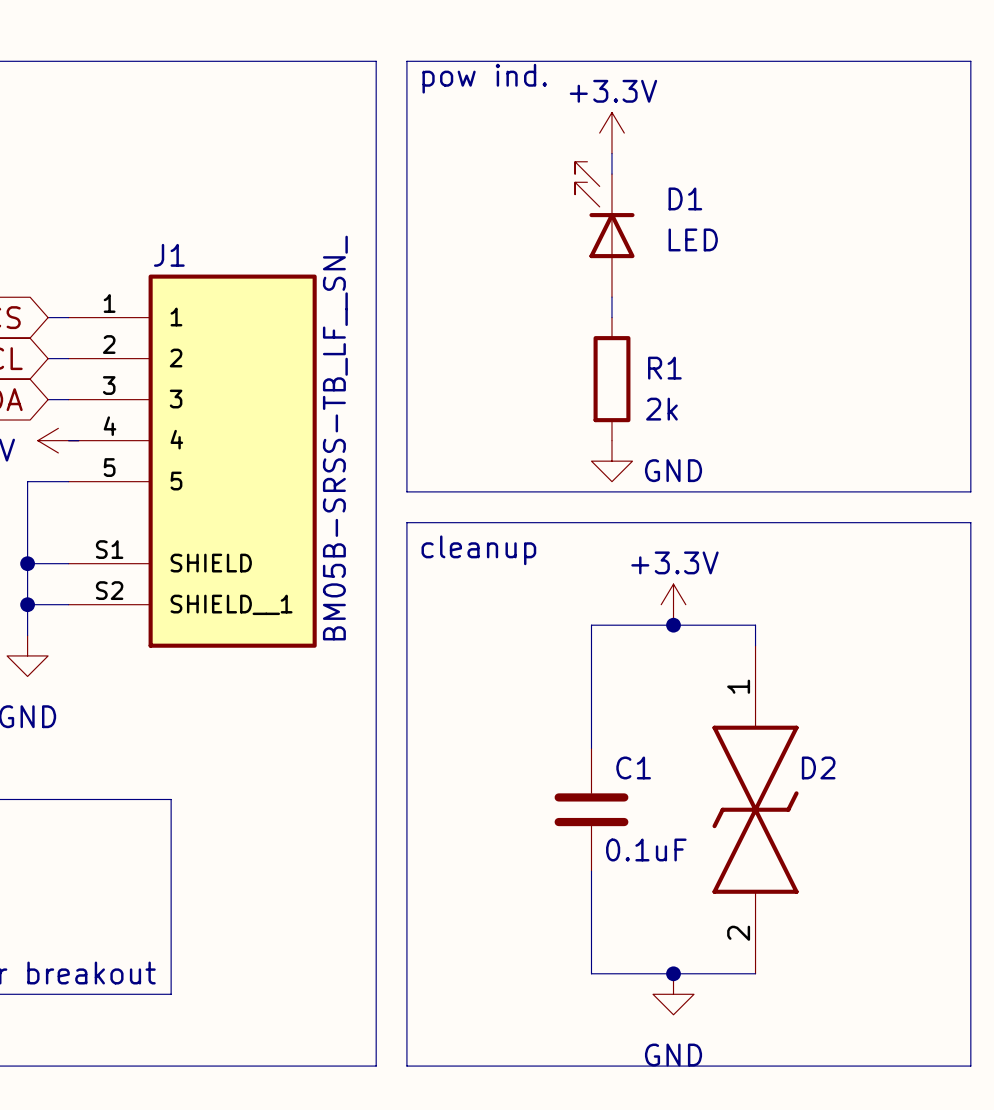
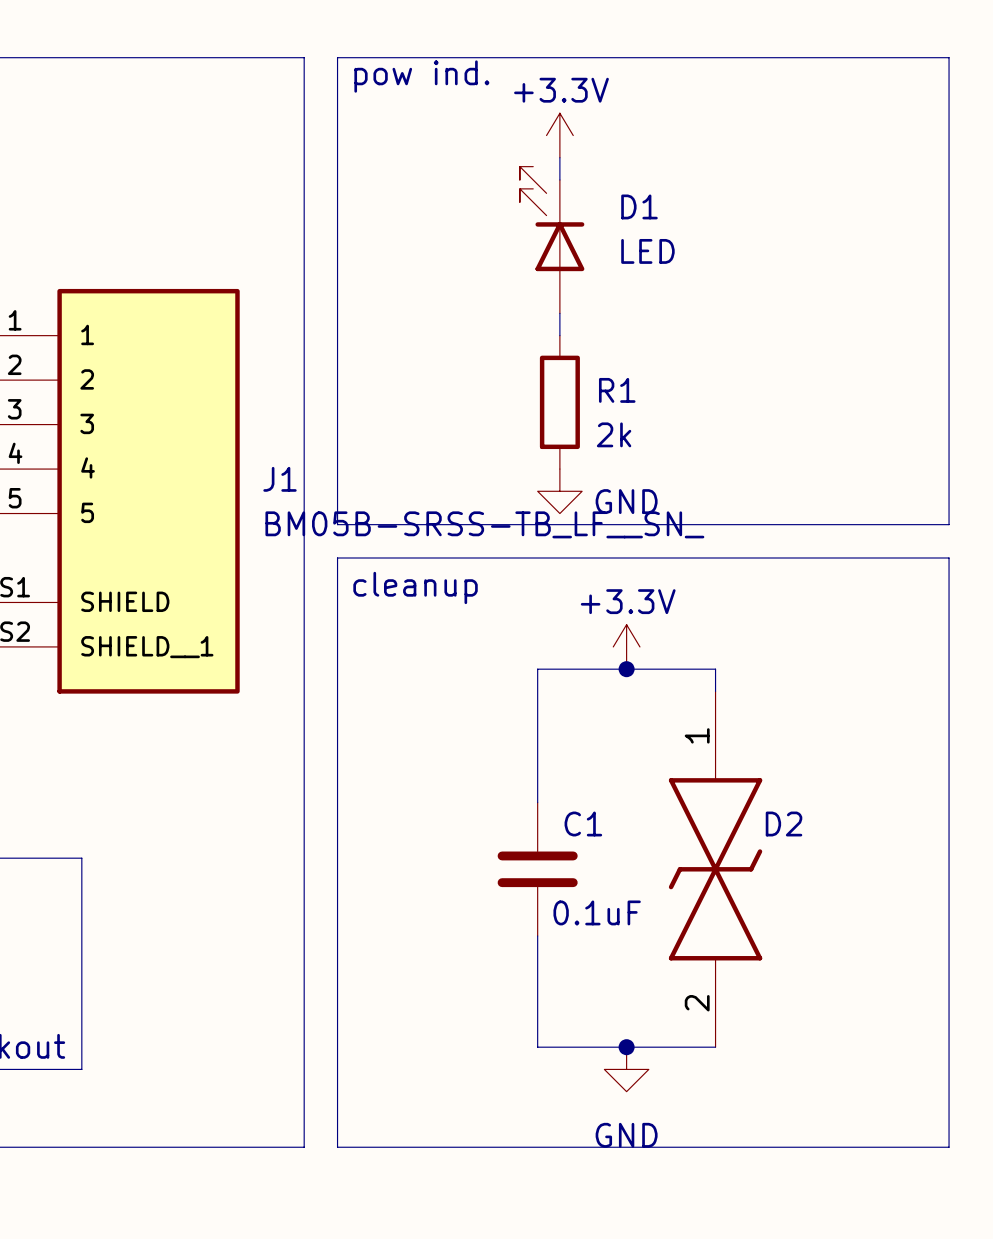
J1 name position: J1 (169, 255) -> J1 (280, 479)
J1 value rotation: 0° (335, 438) -> 90° clockwise (484, 524)

